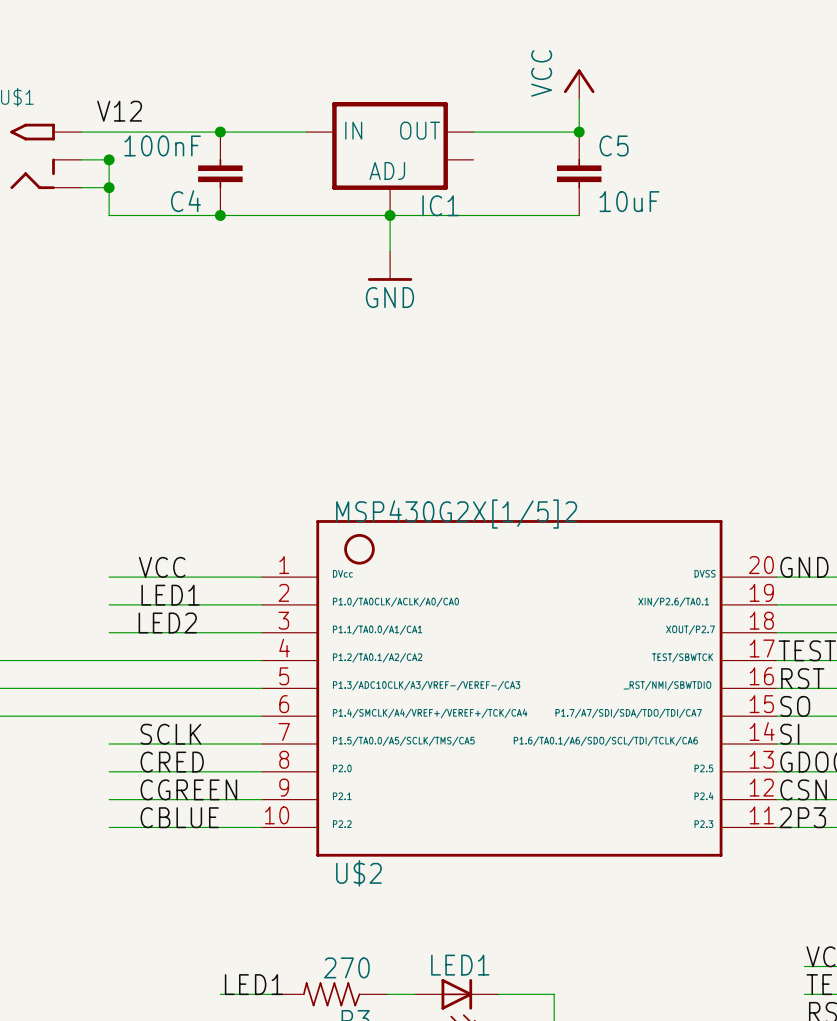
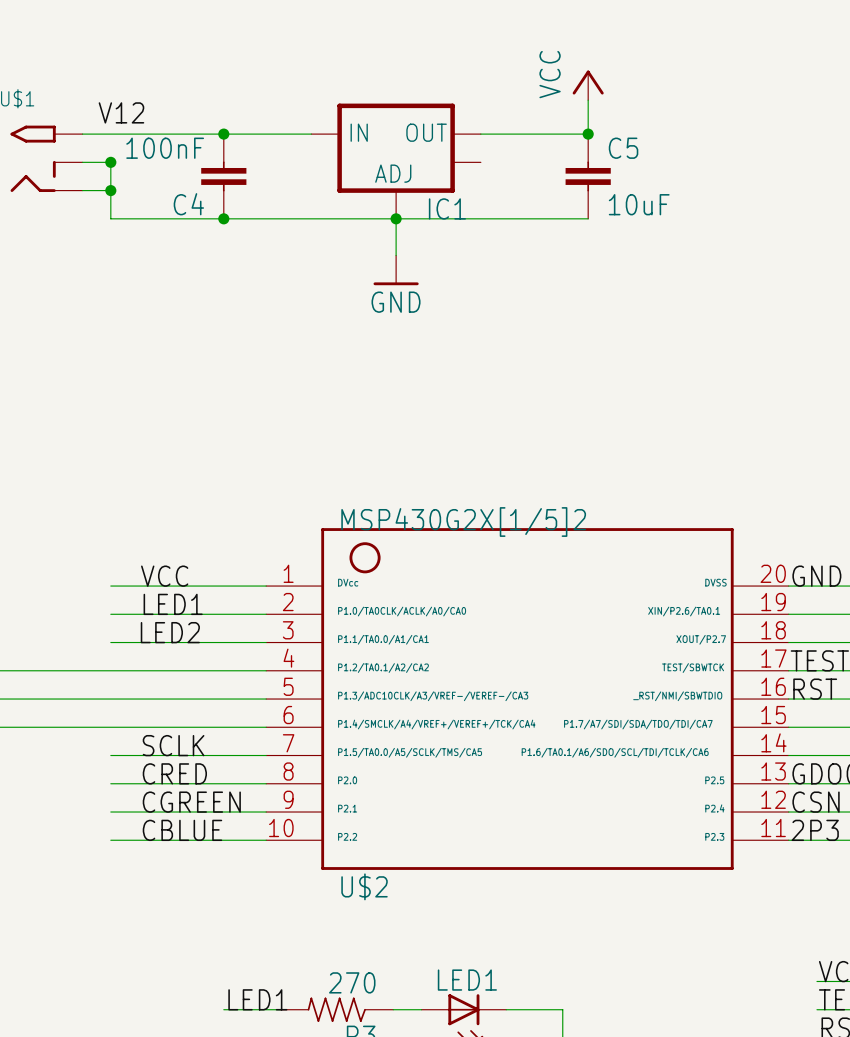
label: SO (795, 706) -> none
label: SI (789, 734) -> none

